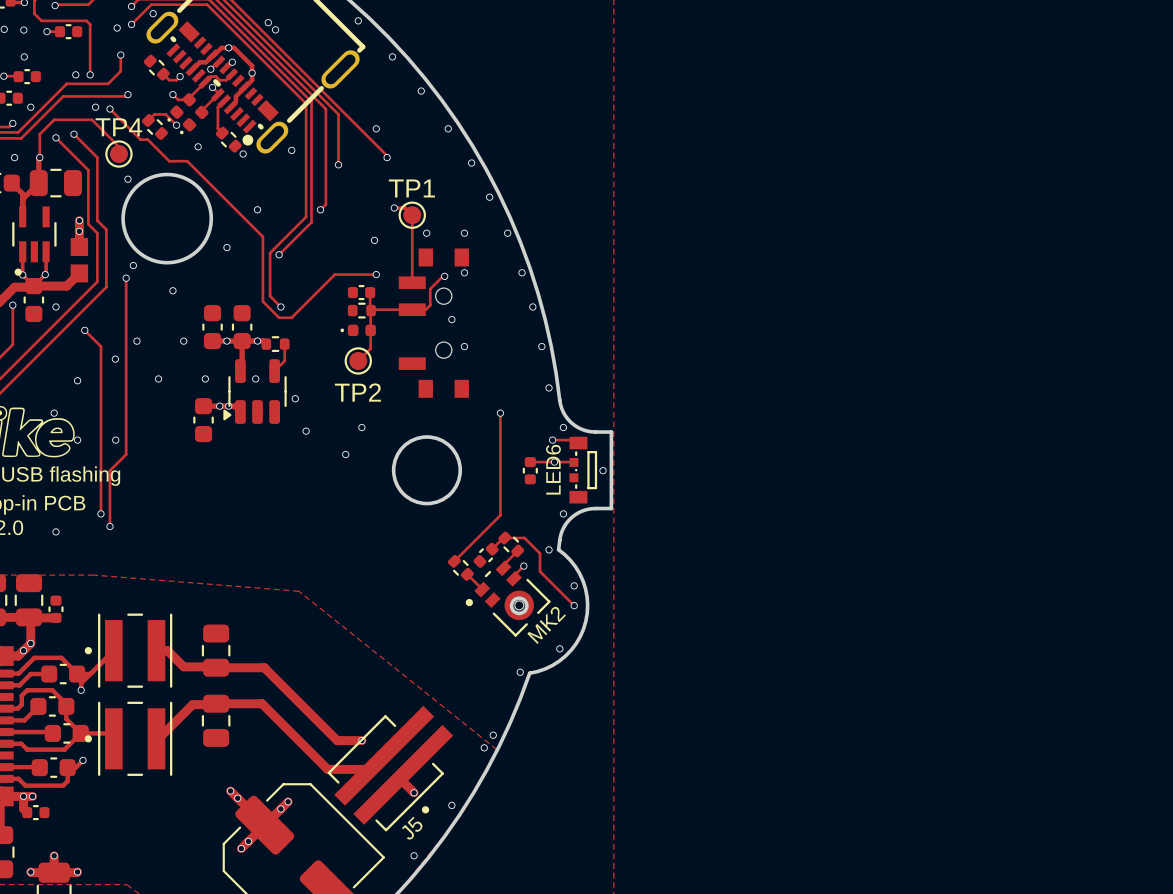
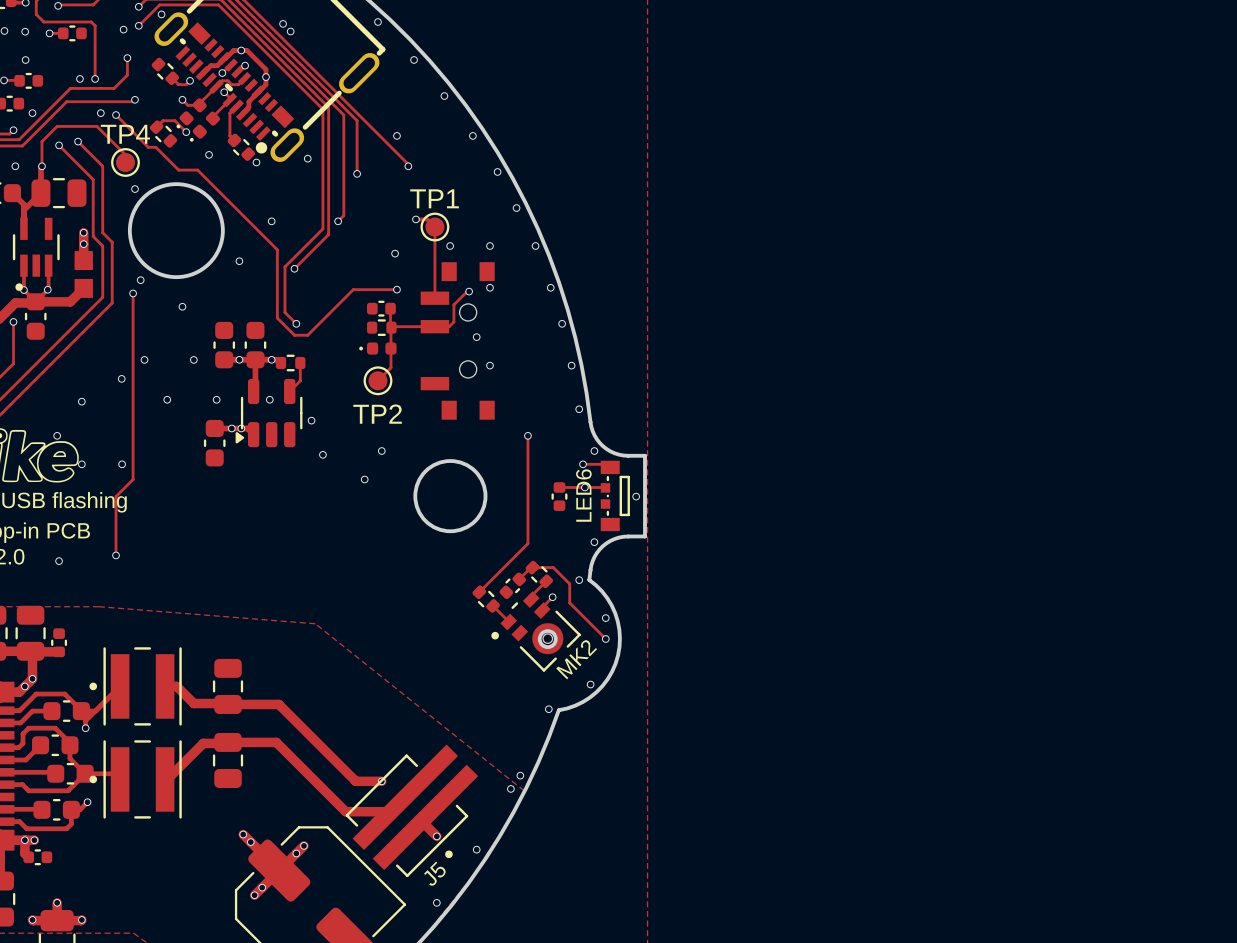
via: (55, 306) -> none
track: (84, 330) (100, 346) (100, 513) -> none
via: (84, 330) -> none
via: (100, 513) -> none

